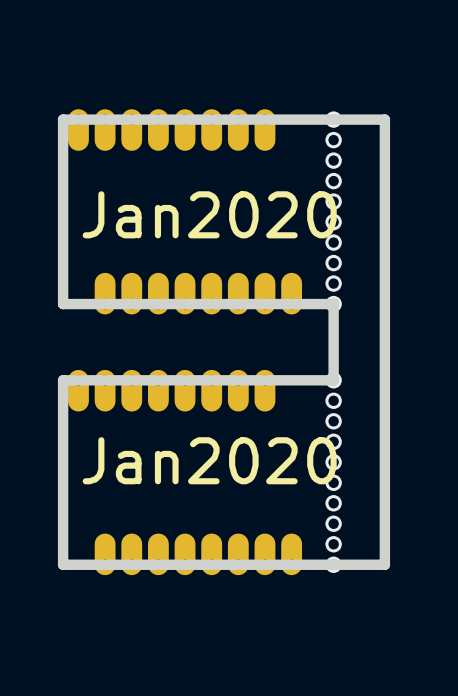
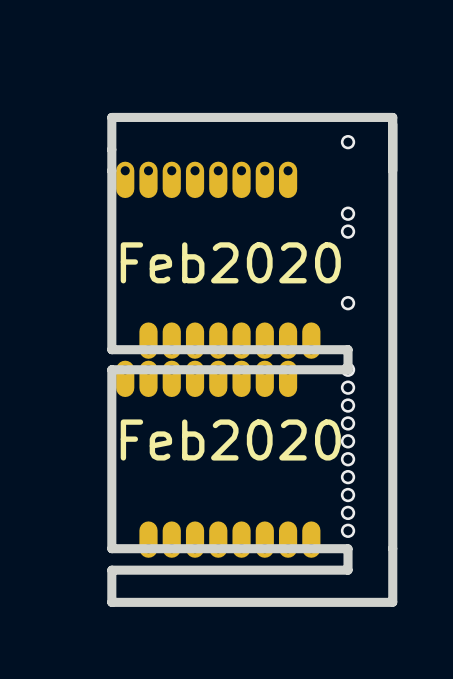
board edge: (384, 119) (63, 119) -> (392, 142) (392, 117) (111, 117) (111, 142)
part: (78, 130) -> none
part: (105, 130) -> none
part: (131, 130) -> none
part: (158, 130) -> none
part: (185, 130) -> none
part: (211, 130) -> none
part: (238, 130) -> none
part: (264, 130) -> none
via: (333, 140) -> none
via: (333, 160) -> none
part: none -> (125, 179)
part: none -> (148, 179)
part: none -> (171, 179)
part: none -> (195, 179)
part: none -> (218, 179)
part: none -> (241, 179)
part: none -> (264, 179)
part: none -> (288, 179)
via: (333, 181) -> none
text: Jan2020 (209, 214) -> none
via: (333, 242) -> none
text: none -> Feb2020 (230, 262)
via: (333, 263) -> none
via: (333, 283) -> none
part: (105, 293) -> none
part: (131, 293) -> none
part: (158, 293) -> none
part: (185, 293) -> none
part: (211, 293) -> none
part: (238, 293) -> none
part: (264, 293) -> none
part: (291, 293) -> none
board edge: (63, 304) (333, 304) (333, 357) -> (111, 303) (111, 349) (348, 349)
part: none -> (148, 340)
part: none -> (171, 340)
part: none -> (195, 340)
part: none -> (218, 340)
part: none -> (241, 340)
part: none -> (264, 340)
part: none -> (288, 340)
part: none -> (311, 340)
text: Jan2020 (209, 460) -> Feb2020 (230, 439)
part: (105, 554) -> none
part: (131, 554) -> none
part: (158, 554) -> none
part: (185, 554) -> none
part: (211, 554) -> none
part: (238, 554) -> none
part: (264, 554) -> none
part: (291, 554) -> none
board edge: (384, 564) (63, 564) -> (348, 548) (111, 548) (111, 530)
board edge: none -> (392, 530) (392, 602)
part: none -> (148, 539)
part: none -> (171, 539)
part: none -> (195, 539)
part: none -> (218, 539)
part: none -> (241, 539)
part: none -> (264, 539)
part: none -> (288, 539)
part: none -> (311, 539)
board edge: none -> (348, 549) (348, 570) (111, 570) (111, 602) (392, 602)

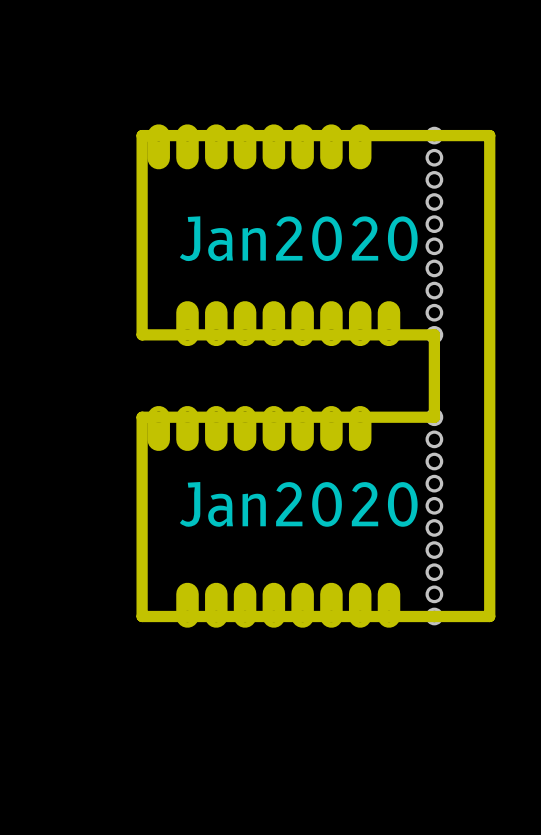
board edge: (392, 142) (392, 117) (111, 117) (111, 142) -> (489, 135) (142, 135)
part: none -> (158, 146)
part: none -> (187, 146)
part: none -> (216, 146)
part: none -> (245, 146)
part: none -> (273, 146)
part: none -> (302, 146)
part: none -> (331, 146)
part: none -> (360, 146)
via: none -> (434, 157)
via: none -> (434, 179)
part: (125, 179) -> none
part: (148, 179) -> none
part: (171, 179) -> none
part: (195, 179) -> none
part: (218, 179) -> none
part: (241, 179) -> none
part: (264, 179) -> none
part: (288, 179) -> none
via: none -> (434, 202)
text: none -> Jan2020 (298, 238)
via: none -> (434, 268)
text: Feb2020 (230, 262) -> none
via: none -> (434, 290)
via: none -> (434, 312)
part: none -> (187, 323)
part: none -> (216, 323)
part: none -> (245, 323)
part: none -> (273, 323)
part: none -> (302, 323)
part: none -> (331, 323)
part: none -> (360, 323)
part: none -> (388, 323)
board edge: (111, 303) (111, 349) (348, 349) -> (142, 334) (434, 334) (434, 392)
part: (148, 340) -> none
part: (171, 340) -> none
part: (195, 340) -> none
part: (218, 340) -> none
part: (241, 340) -> none
part: (264, 340) -> none
part: (288, 340) -> none
part: (311, 340) -> none
text: Feb2020 (230, 439) -> Jan2020 (298, 504)
part: none -> (187, 605)
part: none -> (216, 605)
part: none -> (245, 605)
part: none -> (273, 605)
part: none -> (302, 605)
part: none -> (331, 605)
part: none -> (360, 605)
part: none -> (388, 605)
board edge: (111, 530) (111, 548) (348, 548) -> (142, 616) (489, 616)
board edge: (392, 530) (392, 602) -> none
part: (148, 539) -> none
part: (171, 539) -> none
part: (195, 539) -> none
part: (218, 539) -> none
part: (241, 539) -> none
part: (264, 539) -> none
part: (288, 539) -> none
part: (311, 539) -> none
board edge: (348, 549) (348, 570) (111, 570) (111, 602) (392, 602) -> none

